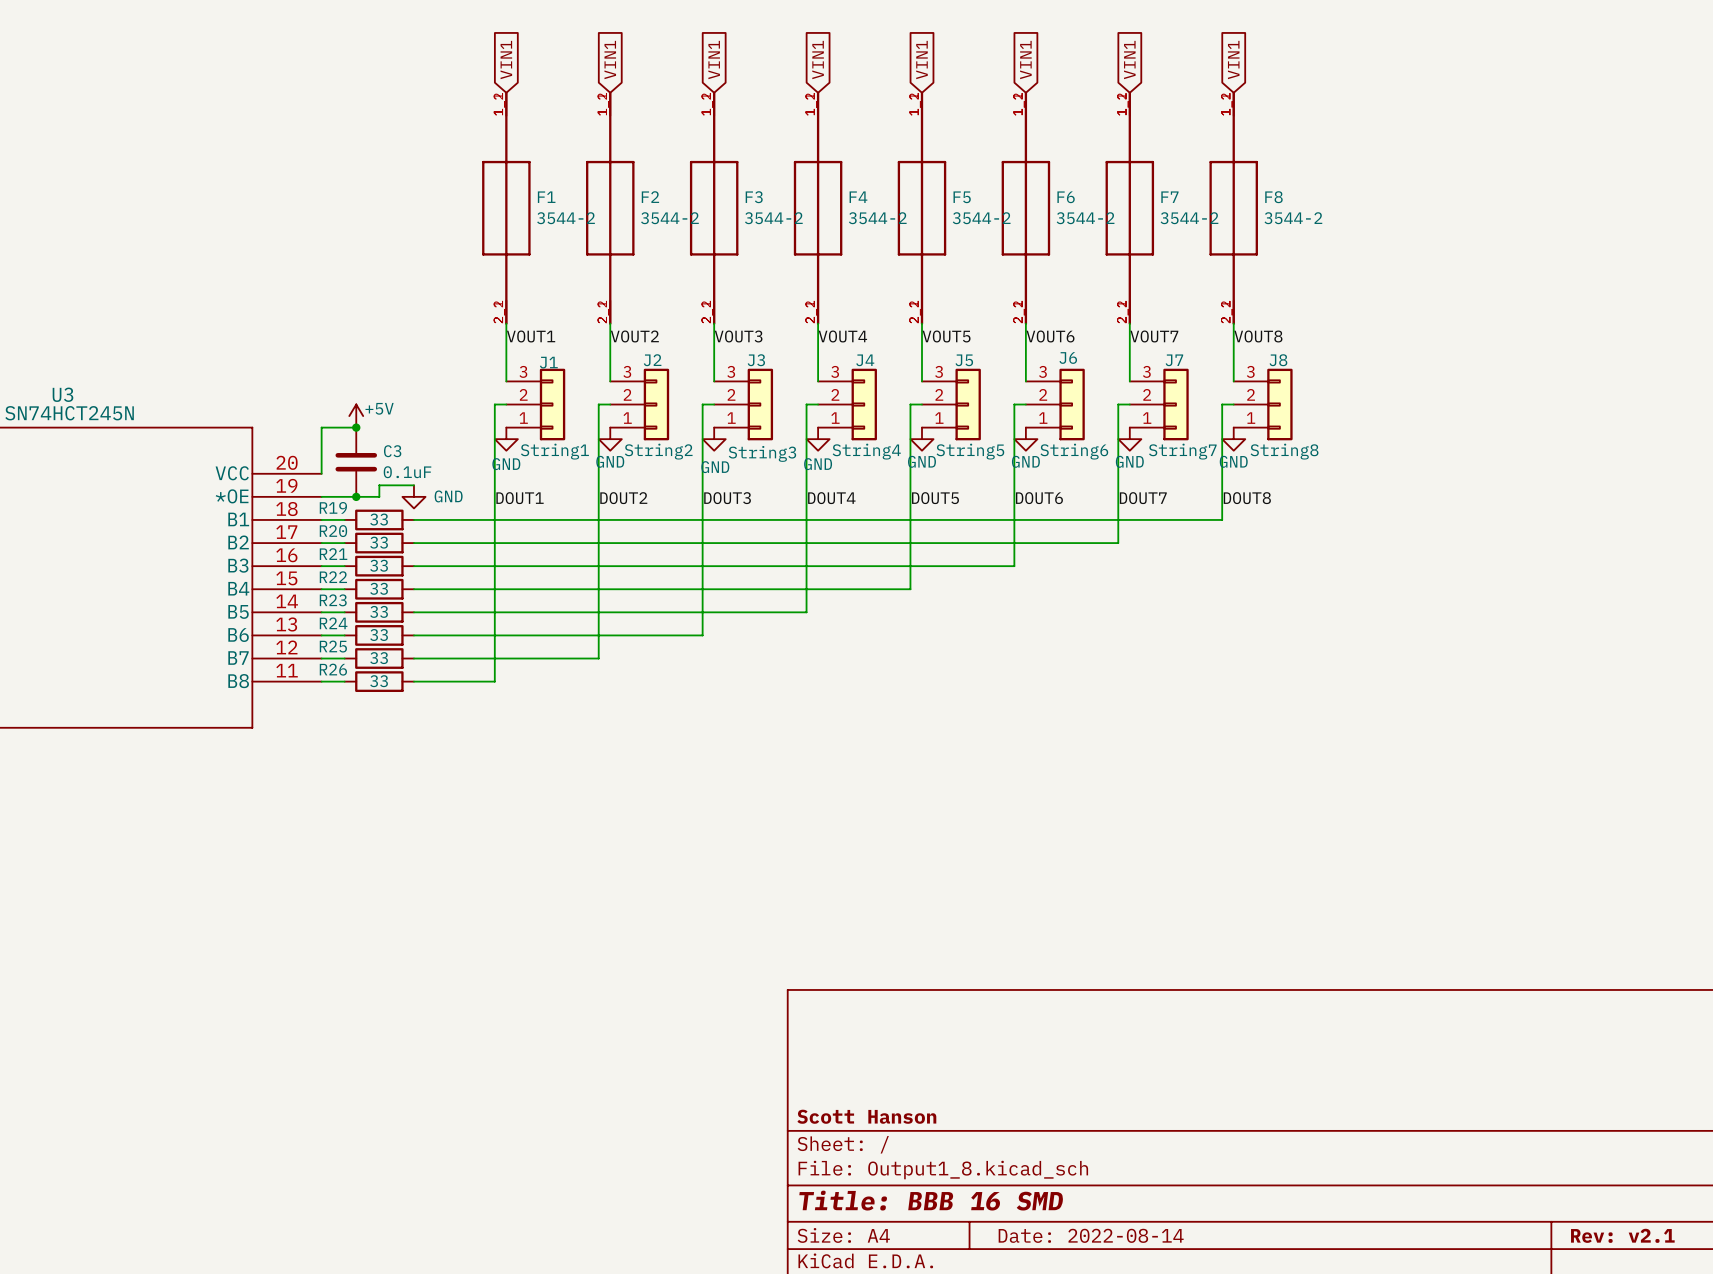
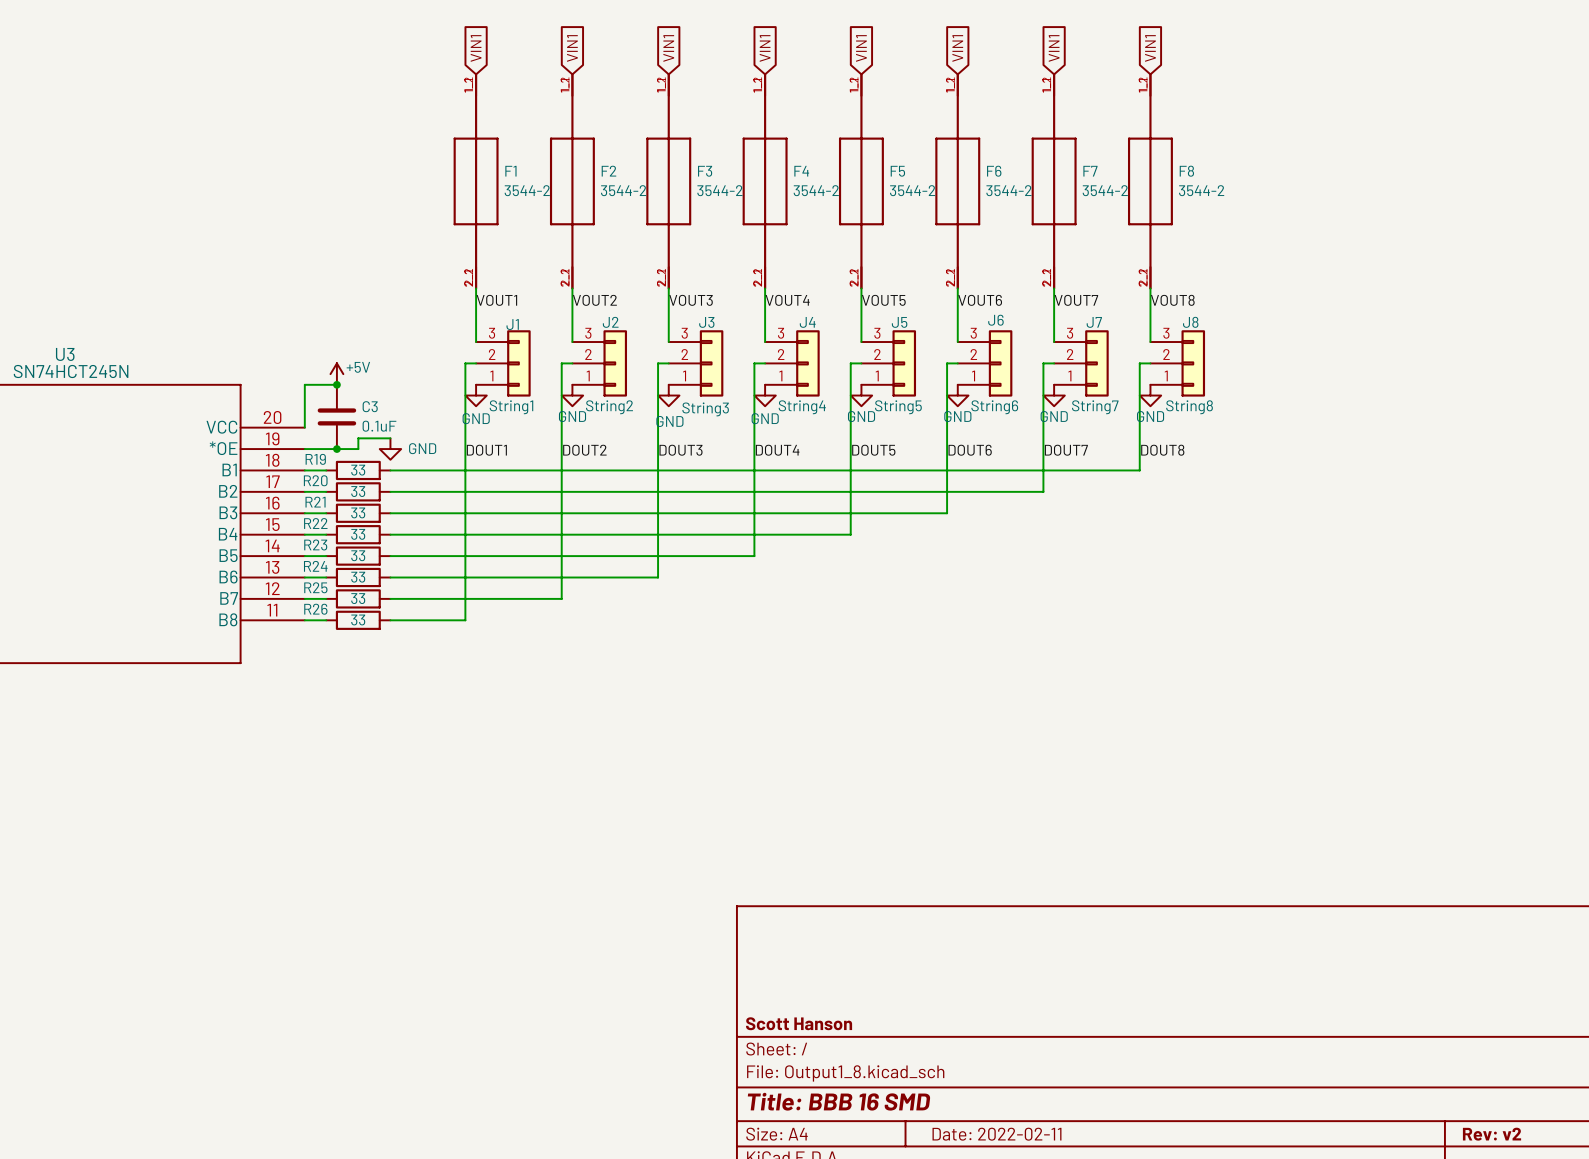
title block: Date: 2022-08-14 (1091, 1235) -> Date: 2022-02-11 (996, 1134)
title block: Rev: v2.1 (1622, 1235) -> Rev: v2 (1492, 1134)

